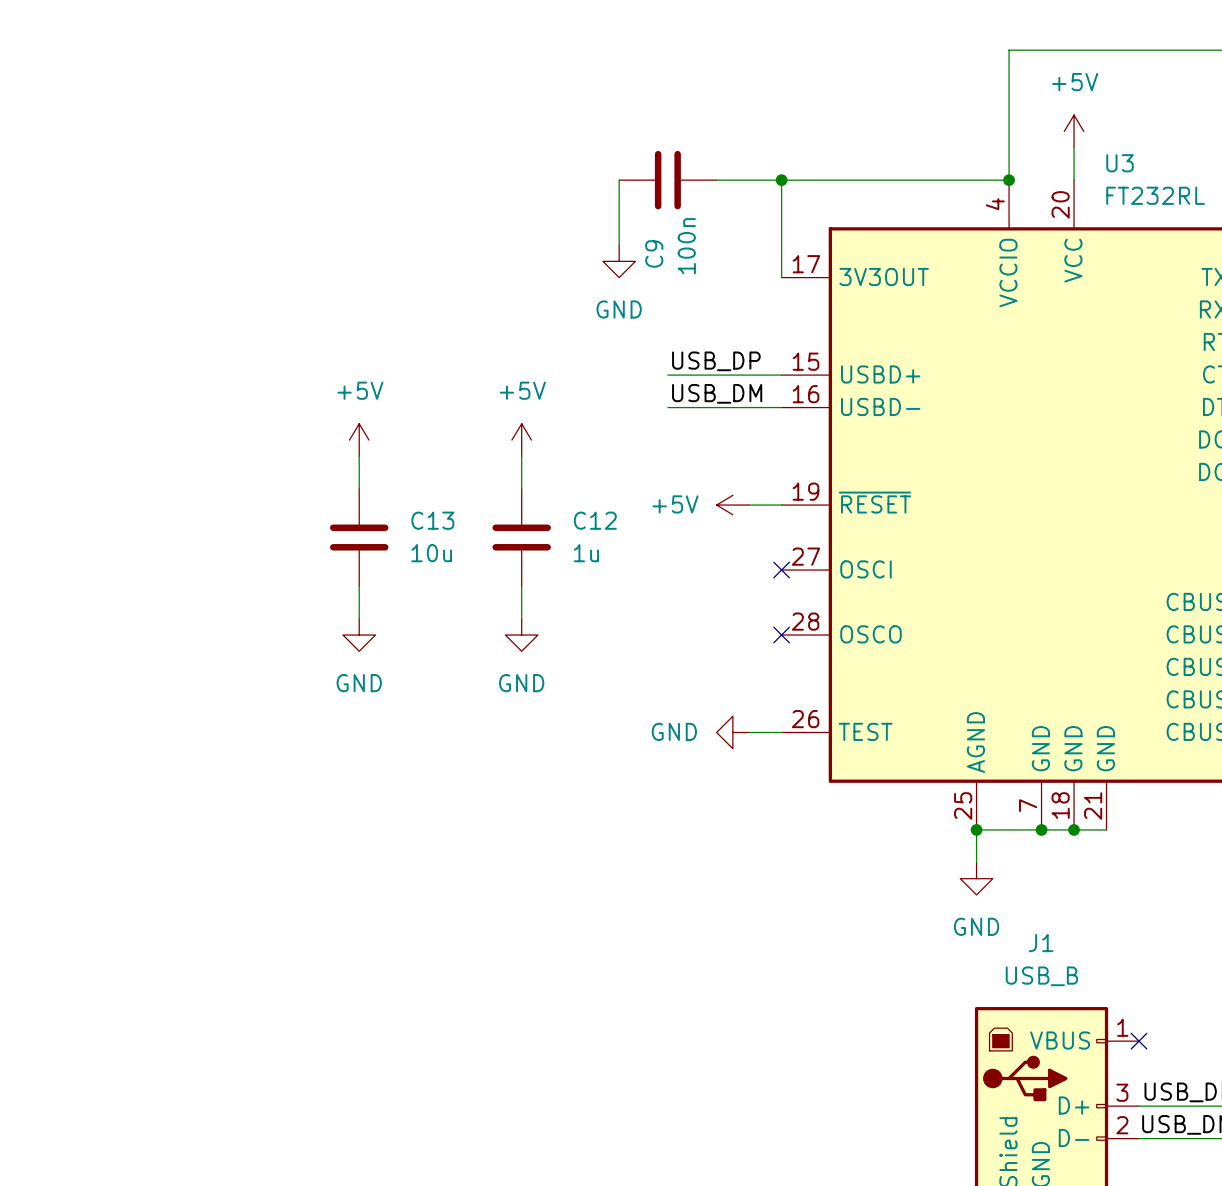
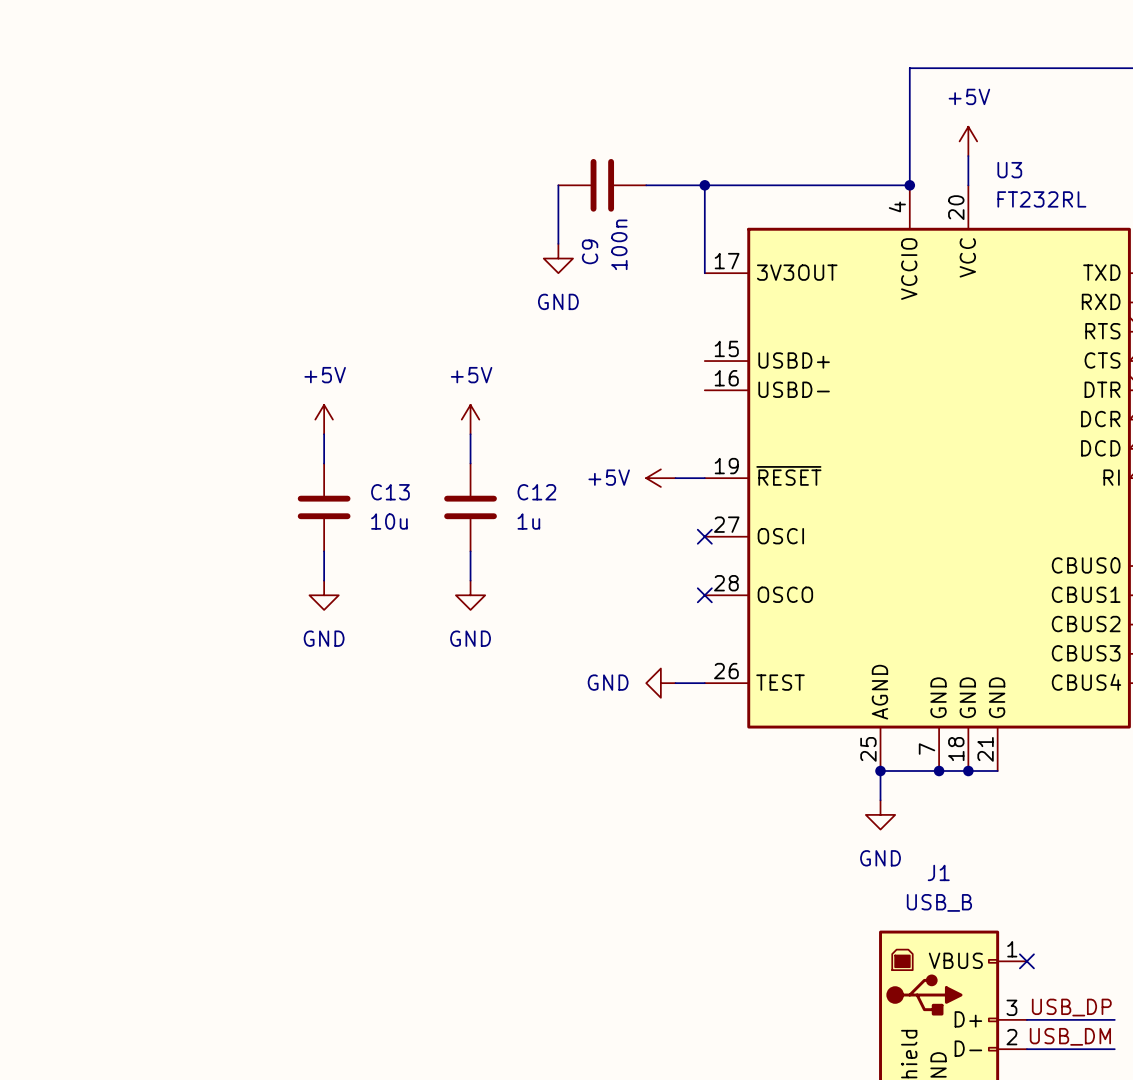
label: USB_DP (716, 361) -> none
wire: (667, 375) (781, 375) -> none
label: USB_DM (717, 393) -> none
wire: (667, 407) (781, 407) -> none

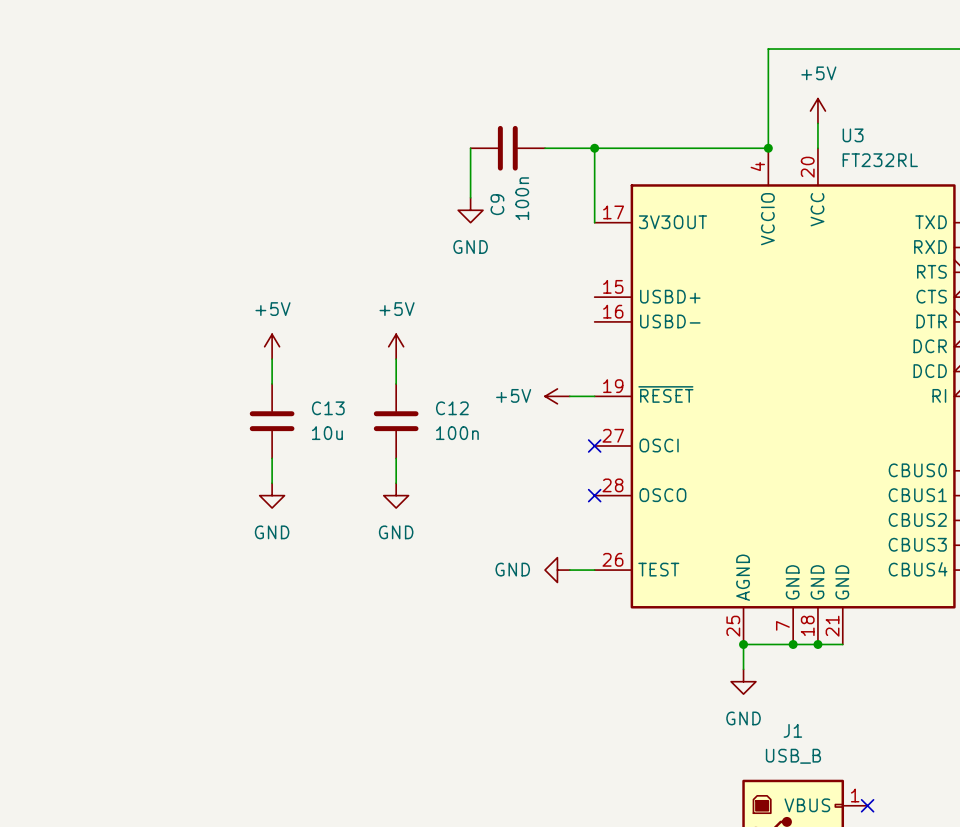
C12 value: 1u (528, 521) -> 100n (457, 433)

